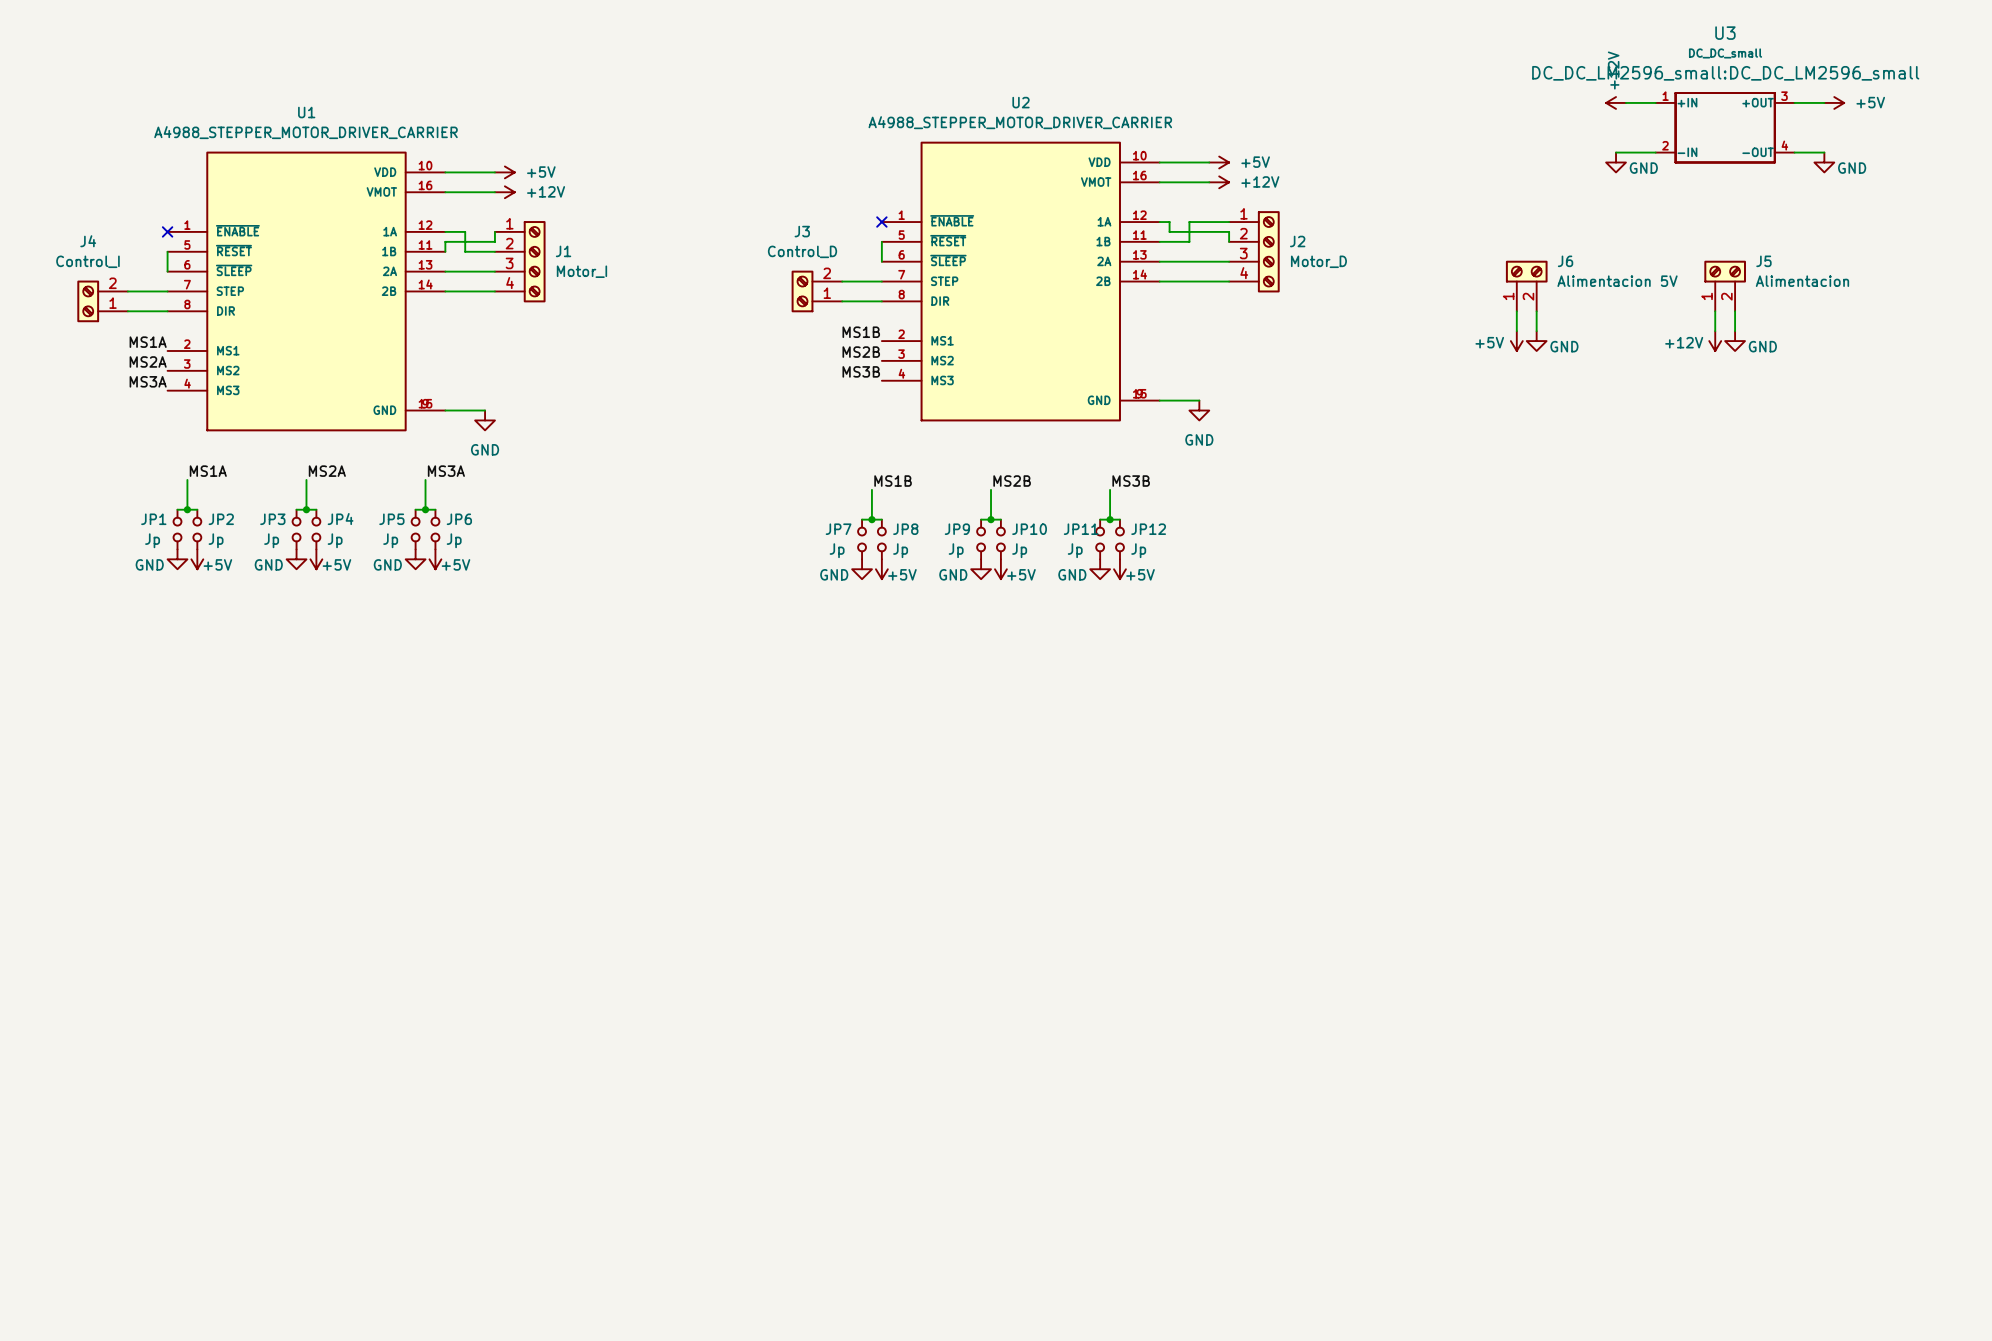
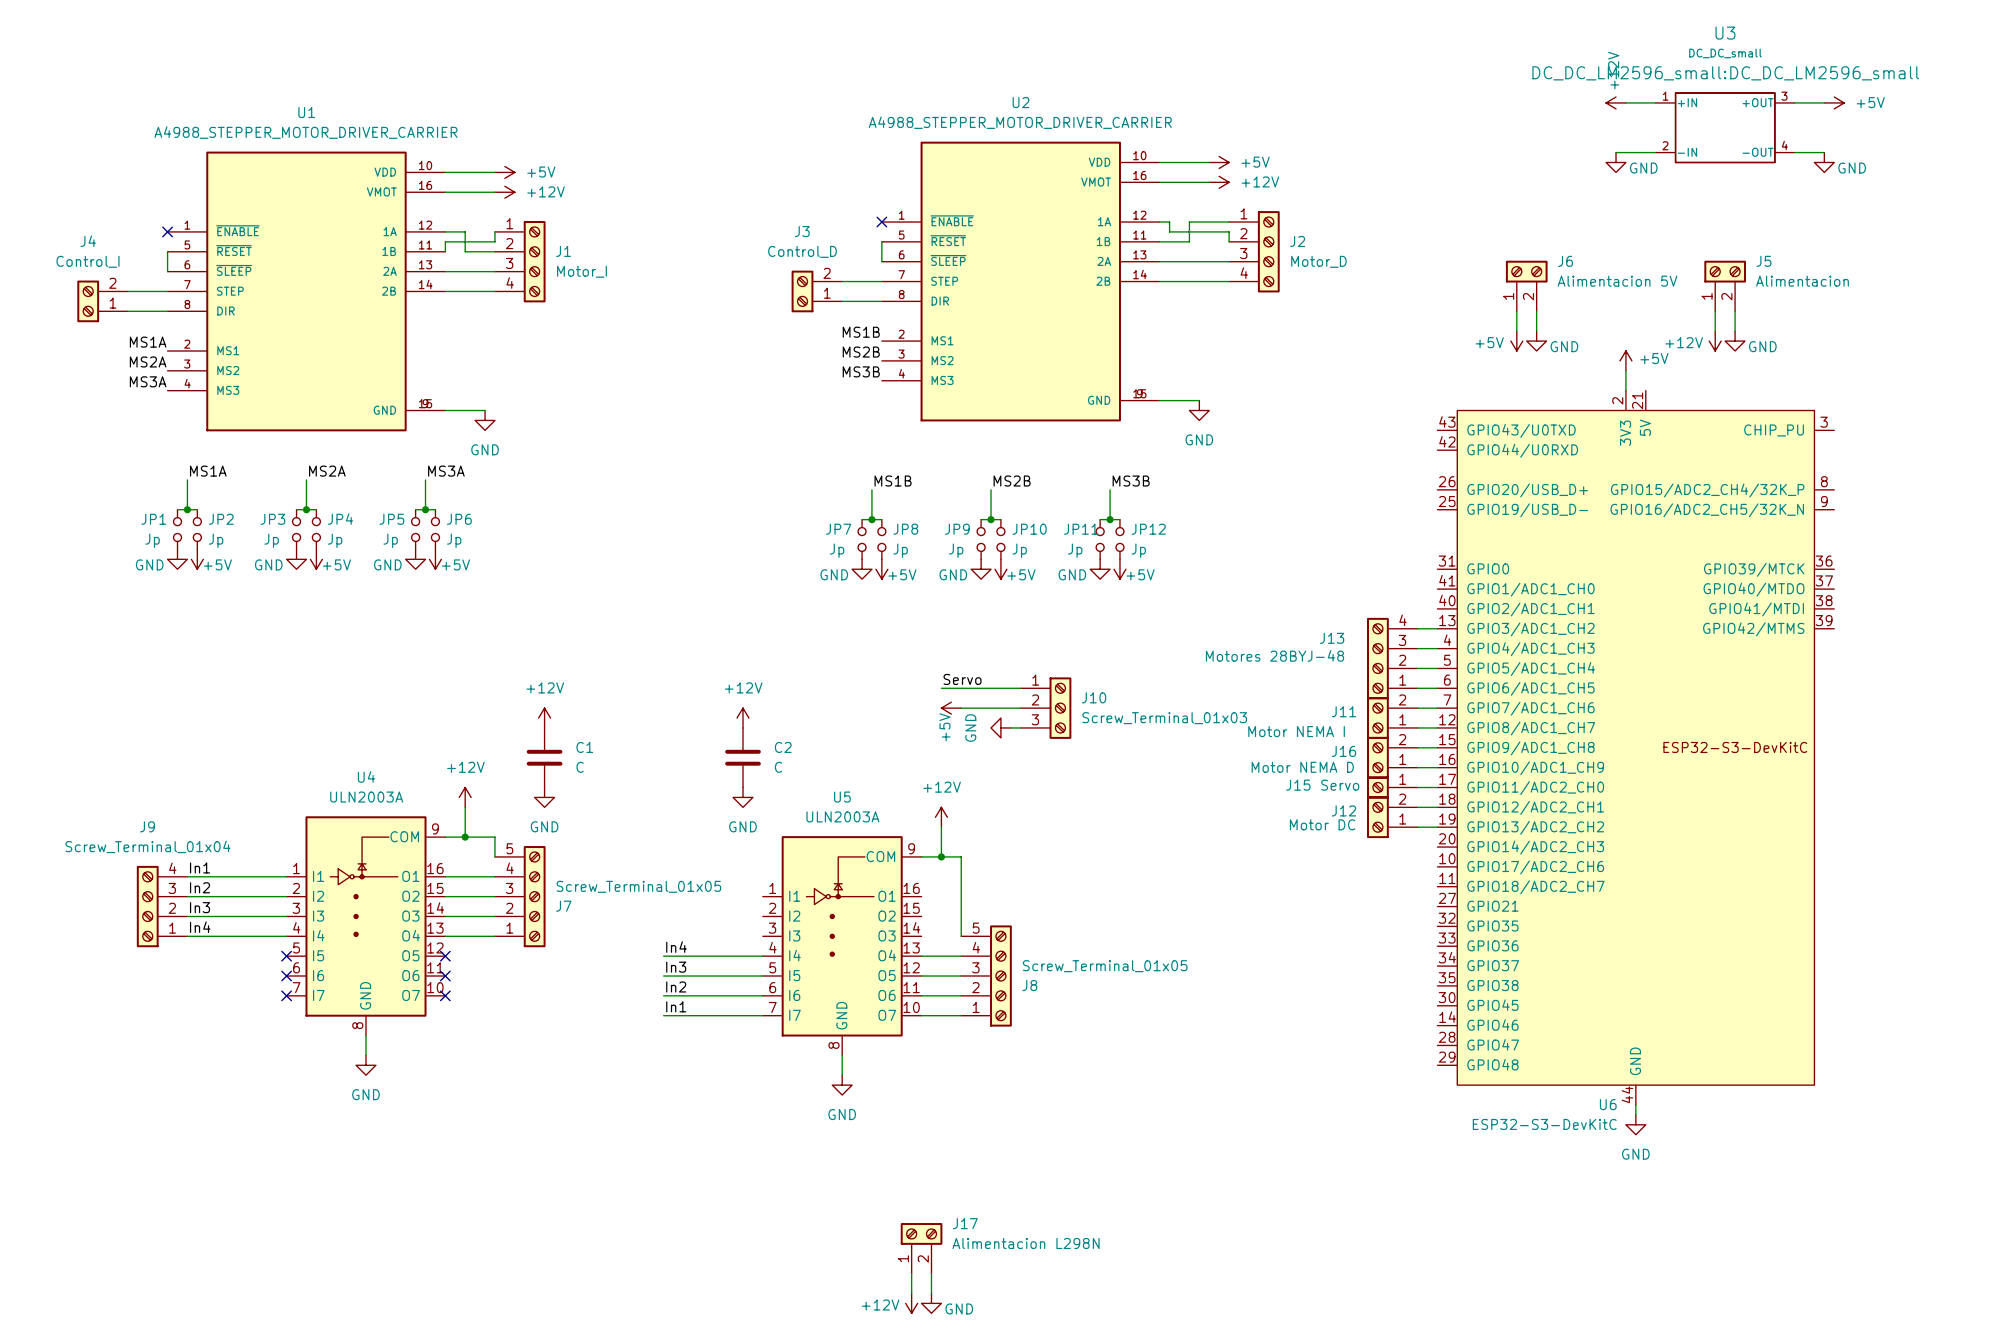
power symbol: none -> +5V (1625, 360)
wire: none -> (1625, 370) (1625, 390)
wire: none -> (1417, 628) (1437, 628)
wire: none -> (1417, 648) (1437, 648)
J13: none -> Motores 28BYJ-48 (1392, 658)
wire: none -> (1417, 668) (1437, 668)
label: none -> Servo (962, 679)
wire: none -> (941, 688) (1020, 688)
wire: none -> (1417, 688) (1437, 688)
power symbol: none -> +5V (951, 708)
wire: none -> (961, 708) (1020, 708)
J10: none -> Screw_Terminal_01x03 (1046, 708)
wire: none -> (1417, 708) (1437, 708)
power symbol: none -> +12V (544, 718)
power symbol: none -> +12V (742, 718)
J11: none -> Motor NEMA I (1392, 718)
power symbol: none -> GND (1000, 727)
wire: none -> (1010, 727) (1020, 727)
wire: none -> (1417, 727) (1437, 727)
wire: none -> (1417, 747) (1437, 747)
U6: none -> ESP32-S3-DevKitC (1635, 747)
C1: none -> C (544, 757)
C2: none -> C (742, 757)
J16: none -> Motor NEMA D (1392, 757)
wire: none -> (1417, 767) (1437, 767)
J15: none -> Servo (1392, 787)
wire: none -> (1417, 787) (1437, 787)
power symbol: none -> +12V (465, 797)
power symbol: none -> GND (544, 797)
power symbol: none -> GND (742, 797)
wire: none -> (465, 807) (465, 837)
wire: none -> (1417, 807) (1437, 807)
power symbol: none -> +12V (941, 817)
J12: none -> Motor DC (1392, 817)
wire: none -> (941, 827) (941, 856)
wire: none -> (1417, 827) (1437, 827)
wire: none -> (445, 837) (494, 837) (494, 856)
junction: none -> (465, 837)
wire: none -> (921, 856) (961, 856) (961, 936)
junction: none -> (941, 856)
label: none -> In1 (200, 867)
wire: none -> (187, 876) (286, 876)
wire: none -> (445, 876) (494, 876)
label: none -> In2 (200, 887)
wire: none -> (187, 896) (286, 896)
wire: none -> (445, 896) (494, 896)
J7: none -> Screw_Terminal_01x05 (520, 896)
J9: none -> Screw_Terminal_01x04 (162, 906)
label: none -> In3 (200, 907)
wire: none -> (187, 916) (286, 916)
wire: none -> (445, 916) (494, 916)
U4: none -> ULN2003A (365, 925)
label: none -> In4 (200, 927)
wire: none -> (187, 936) (286, 936)
wire: none -> (445, 936) (494, 936)
U5: none -> ULN2003A (842, 945)
label: none -> In4 (676, 947)
no-connect mark: none -> (286, 956)
no-connect mark: none -> (445, 956)
wire: none -> (663, 956) (762, 956)
wire: none -> (921, 956) (961, 956)
label: none -> In3 (676, 967)
no-connect mark: none -> (286, 976)
no-connect mark: none -> (445, 976)
wire: none -> (663, 976) (762, 976)
wire: none -> (921, 976) (961, 976)
J8: none -> Screw_Terminal_01x05 (986, 976)
label: none -> In2 (676, 986)
no-connect mark: none -> (286, 995)
no-connect mark: none -> (445, 995)
wire: none -> (663, 995) (762, 995)
wire: none -> (921, 995) (961, 995)
label: none -> In1 (676, 1006)
wire: none -> (663, 1015) (762, 1015)
wire: none -> (921, 1015) (961, 1015)
wire: none -> (365, 1035) (365, 1055)
wire: none -> (842, 1055) (842, 1075)
power symbol: none -> GND (365, 1065)
power symbol: none -> GND (842, 1085)
wire: none -> (1635, 1104) (1635, 1114)
power symbol: none -> GND (1635, 1124)
J17: none -> Alimentacion L298N (921, 1248)
wire: none -> (911, 1273) (911, 1293)
wire: none -> (931, 1273) (931, 1293)
power symbol: none -> +12V (911, 1303)
power symbol: none -> GND (931, 1303)

